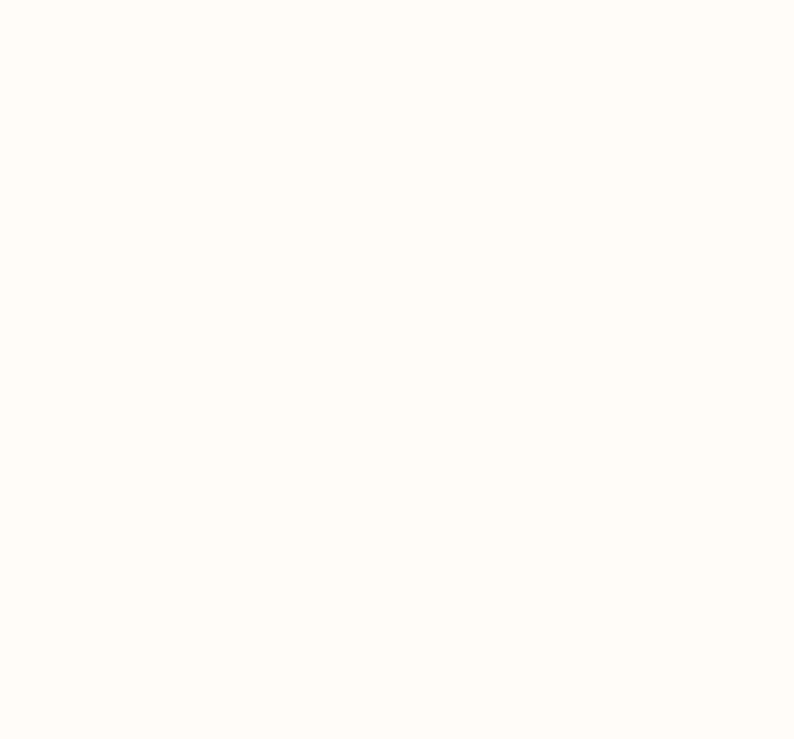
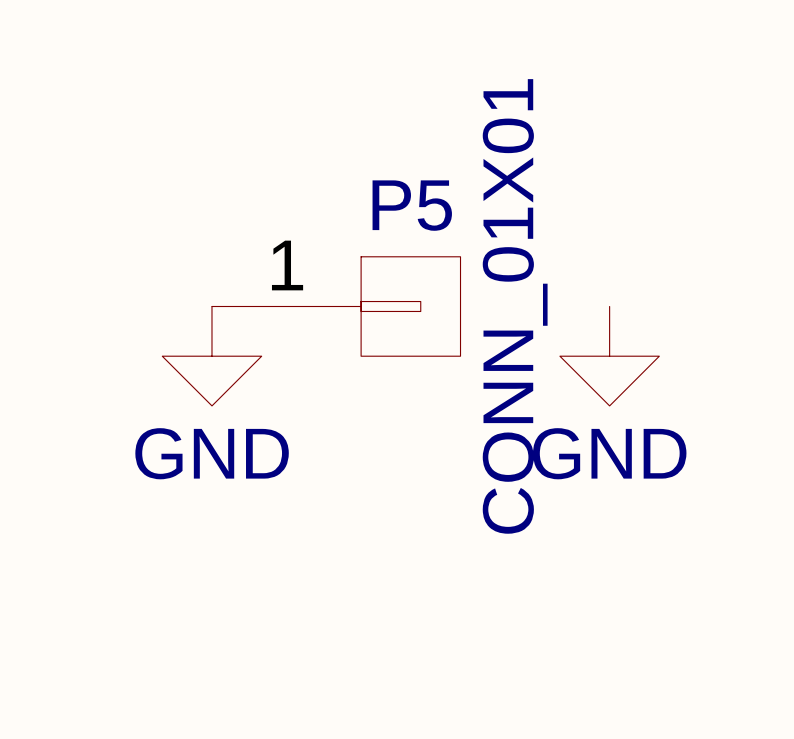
P5: none -> CONN_01X01 (336, 306)
power symbol: none -> GND (211, 356)
power symbol: none -> GND (609, 356)

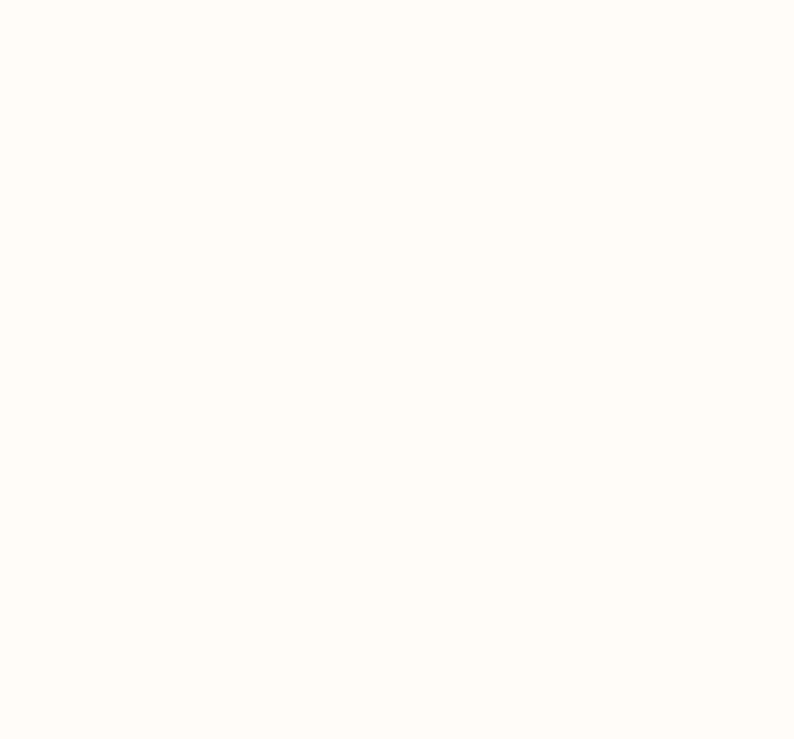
P5: CONN_01X01 (336, 306) -> none
power symbol: GND (211, 356) -> none
power symbol: GND (609, 356) -> none

